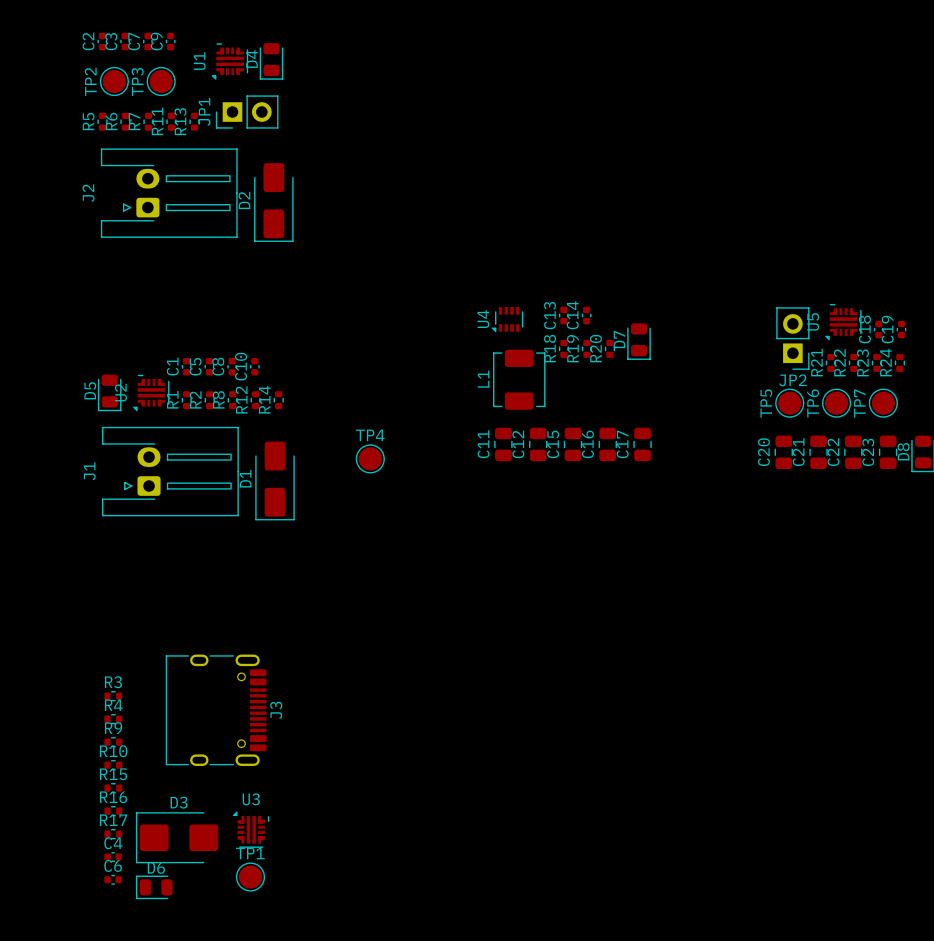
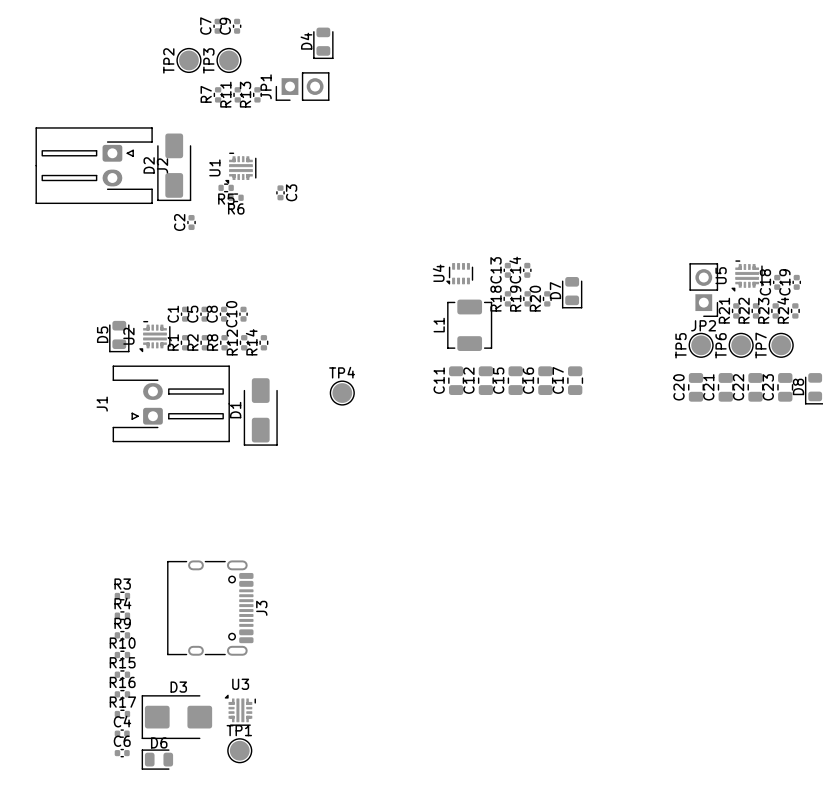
C2 position: (102, 41) -> (191, 222)
C3 name position: C3 (111, 41) -> C3 (291, 192)
C3 position: (125, 41) -> (280, 192)
C7 position: (147, 41) -> (217, 26)
C9 position: (170, 41) -> (237, 26)
U1 position: (229, 61) -> (240, 168)
D4 position: (271, 61) -> (323, 43)
TP2 position: (114, 81) -> (188, 60)
TP3 position: (161, 81) -> (228, 60)
JP1 position: (247, 112) -> (302, 86)
R5 rotation: 0° (102, 121) -> 90° clockwise (226, 187)
R5 position: (102, 121) -> (226, 187)
R6 rotation: 0° (125, 121) -> 90° clockwise (236, 197)
R6 position: (125, 121) -> (236, 197)
R7 position: (148, 121) -> (218, 94)
R11 position: (171, 121) -> (237, 94)
R13 position: (194, 121) -> (257, 94)
J2 rotation: 0° (169, 193) -> 180° (94, 165)
J2 position: (169, 193) -> (94, 165)
D2 position: (273, 202) -> (174, 167)

